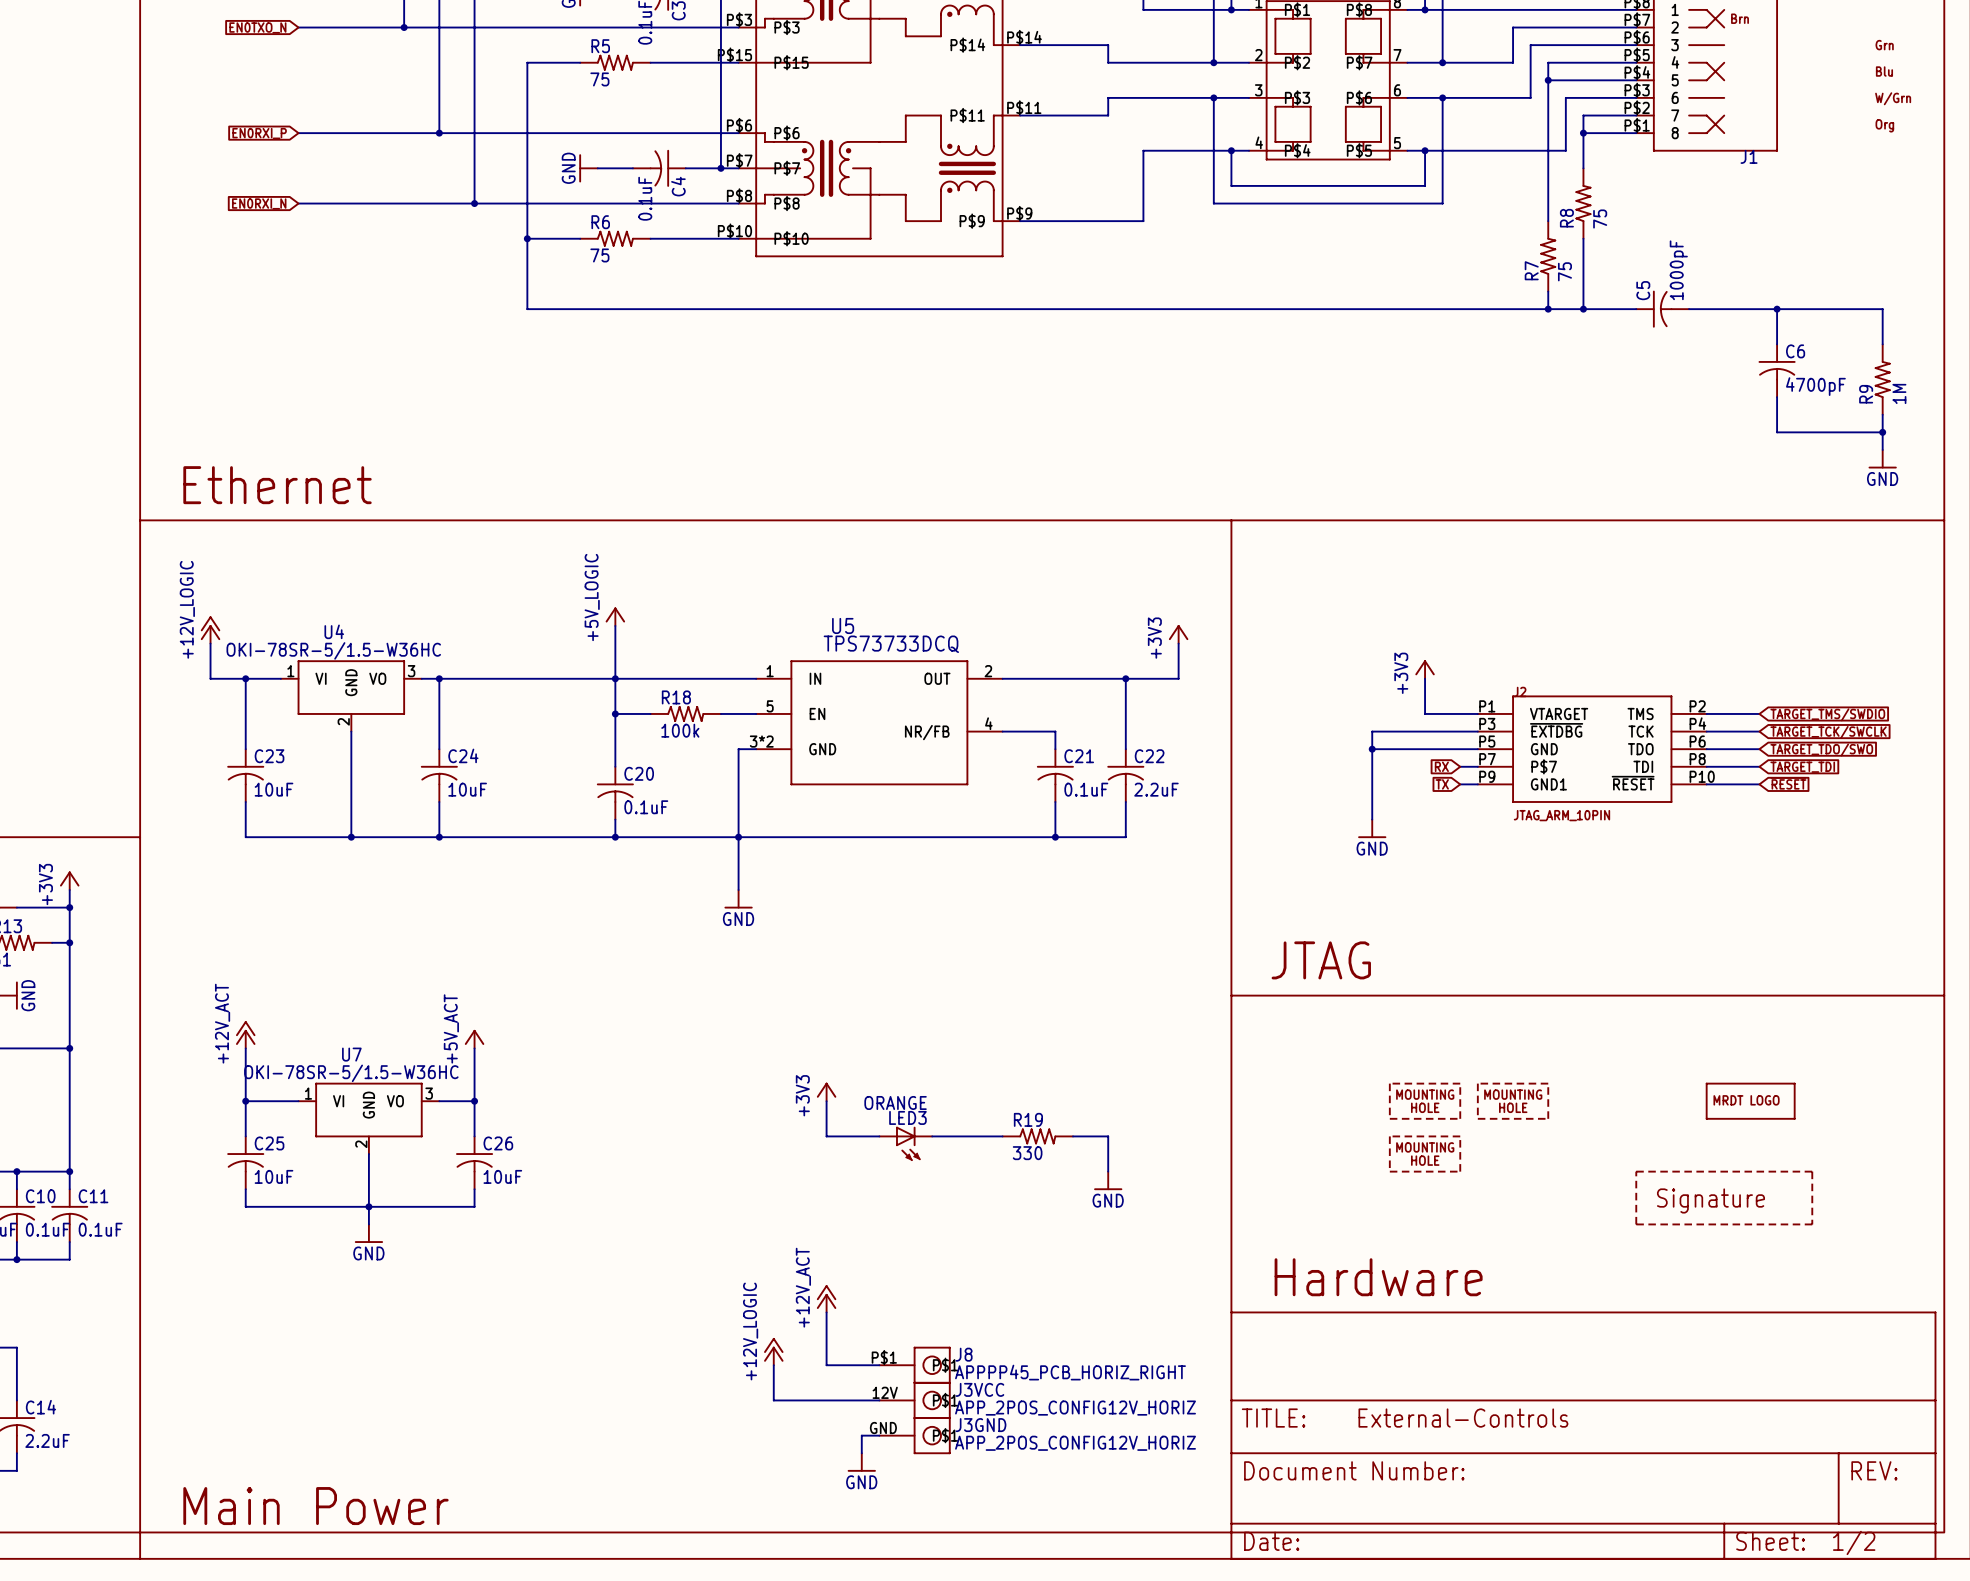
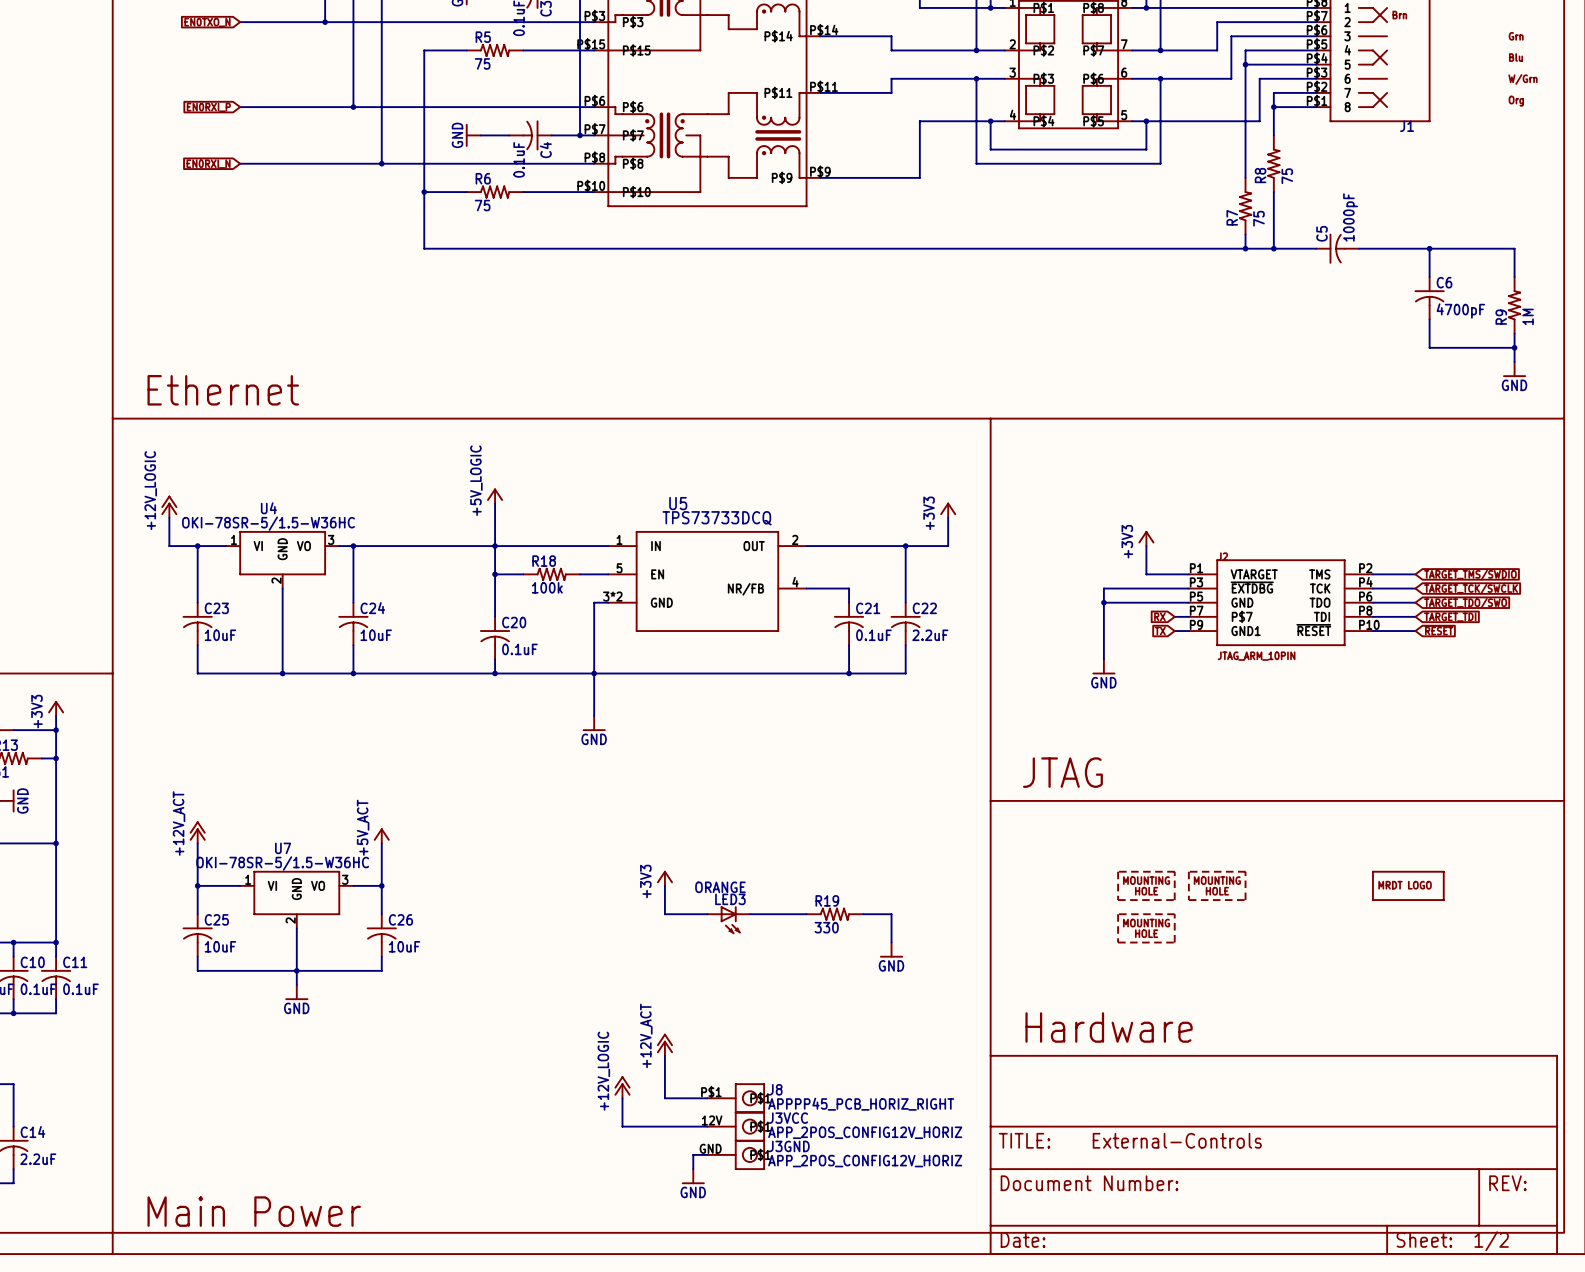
part: (1724, 1198) -> none

